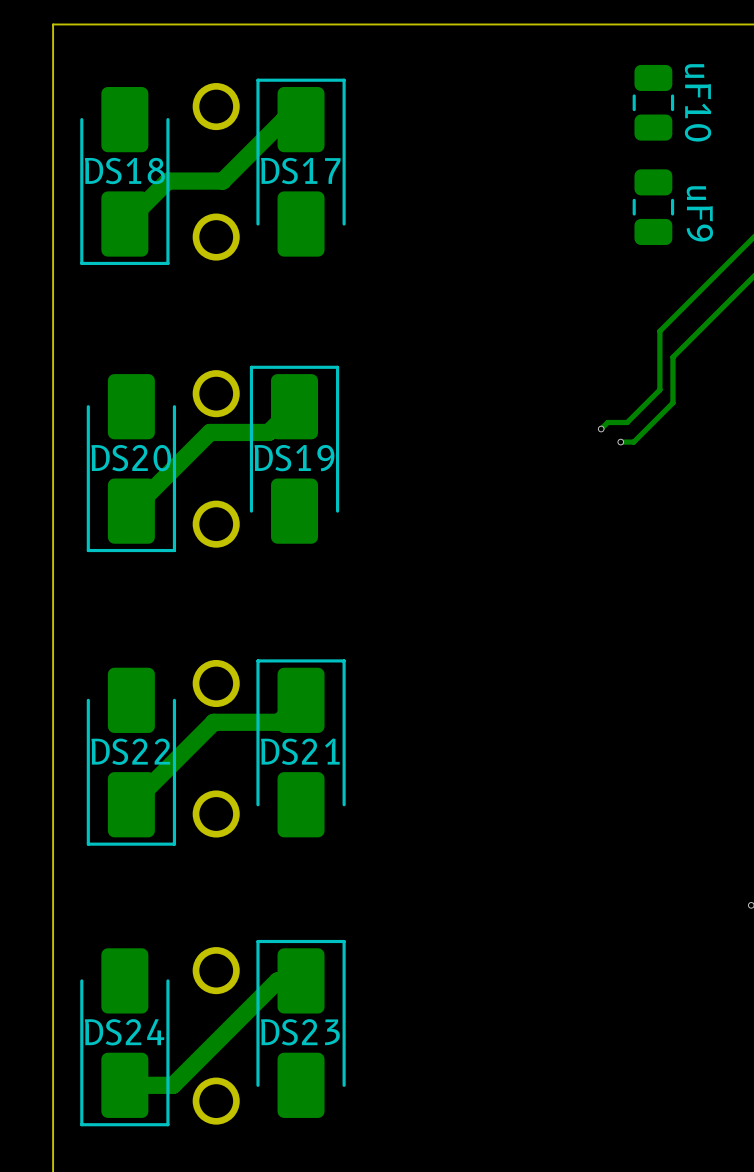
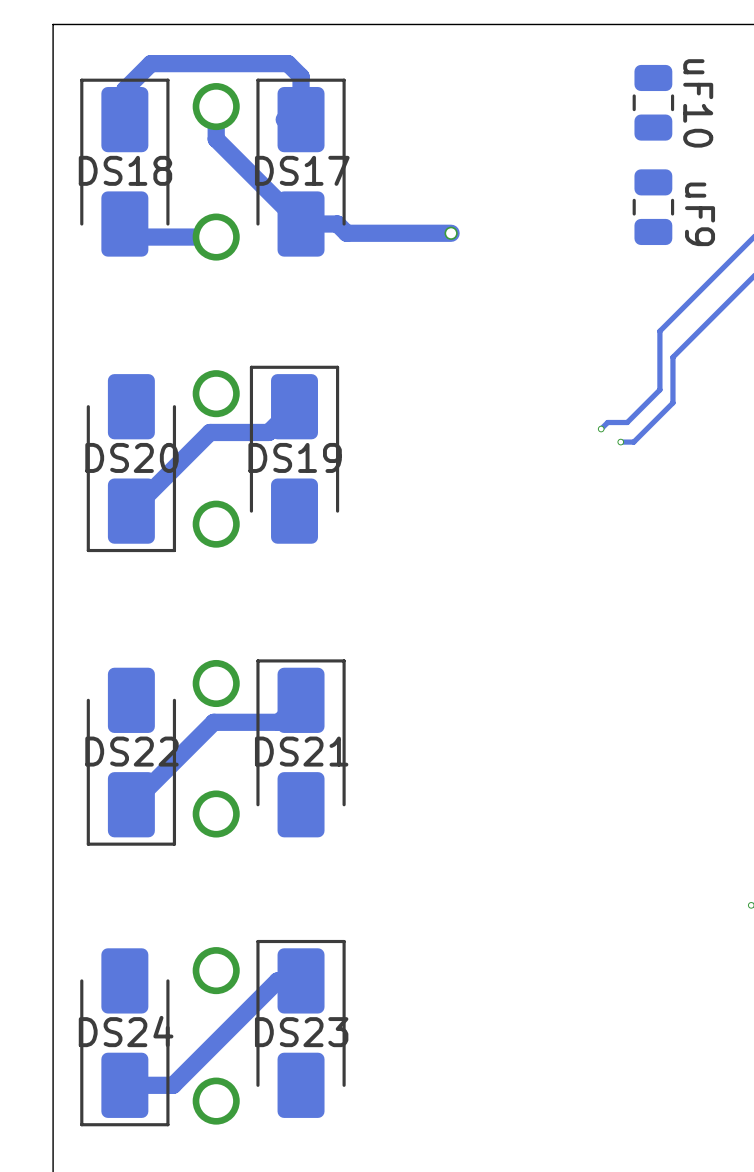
track: none -> (216, 106) (216, 139) (301, 224) (337, 224) (346, 233) (451, 233)
track: (284, 119) (222, 181) (167, 181) (124, 224) -> (216, 237) (137, 237) (124, 224)
track: none -> (301, 119) (301, 76) (287, 63) (150, 63) (124, 89) (124, 119)
DS18 rotation: 0° (124, 175) -> 180° (124, 167)
via: none -> (451, 233)

